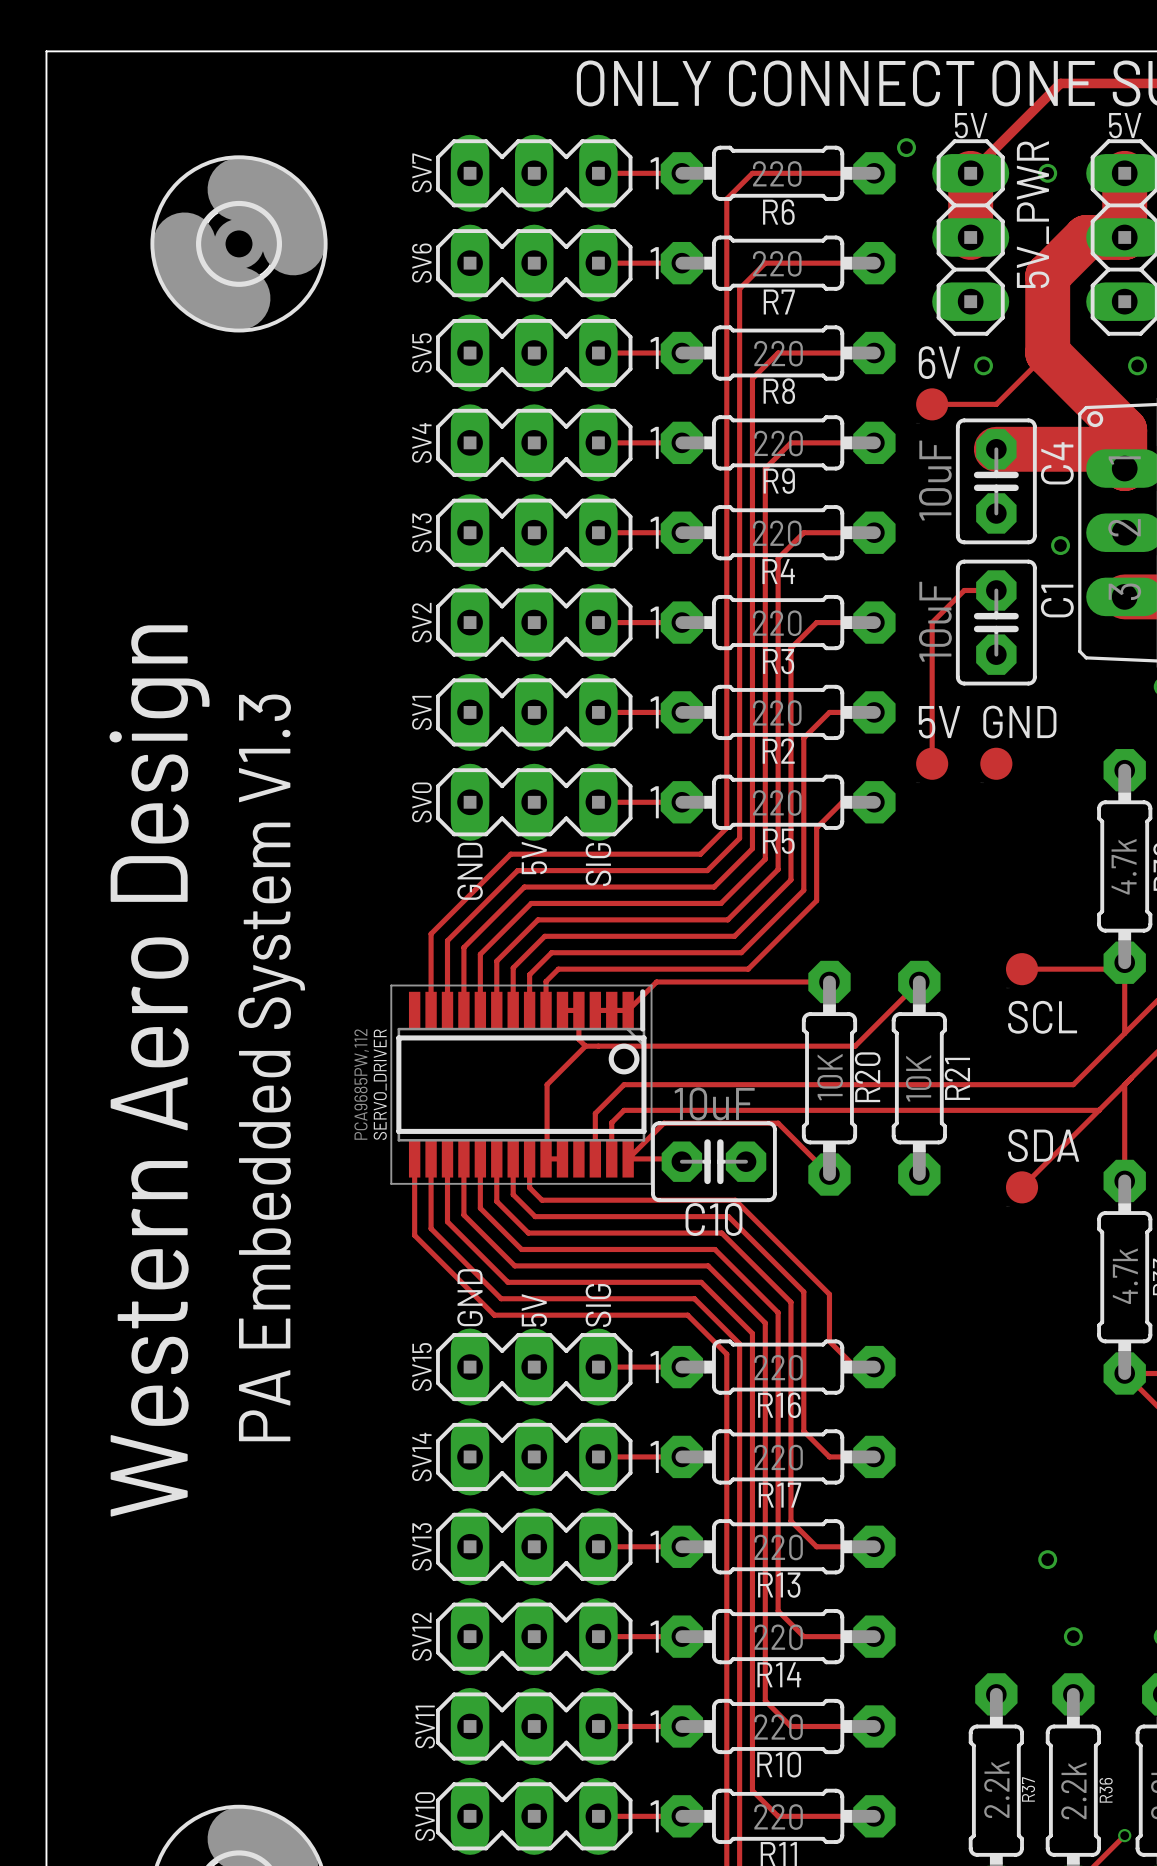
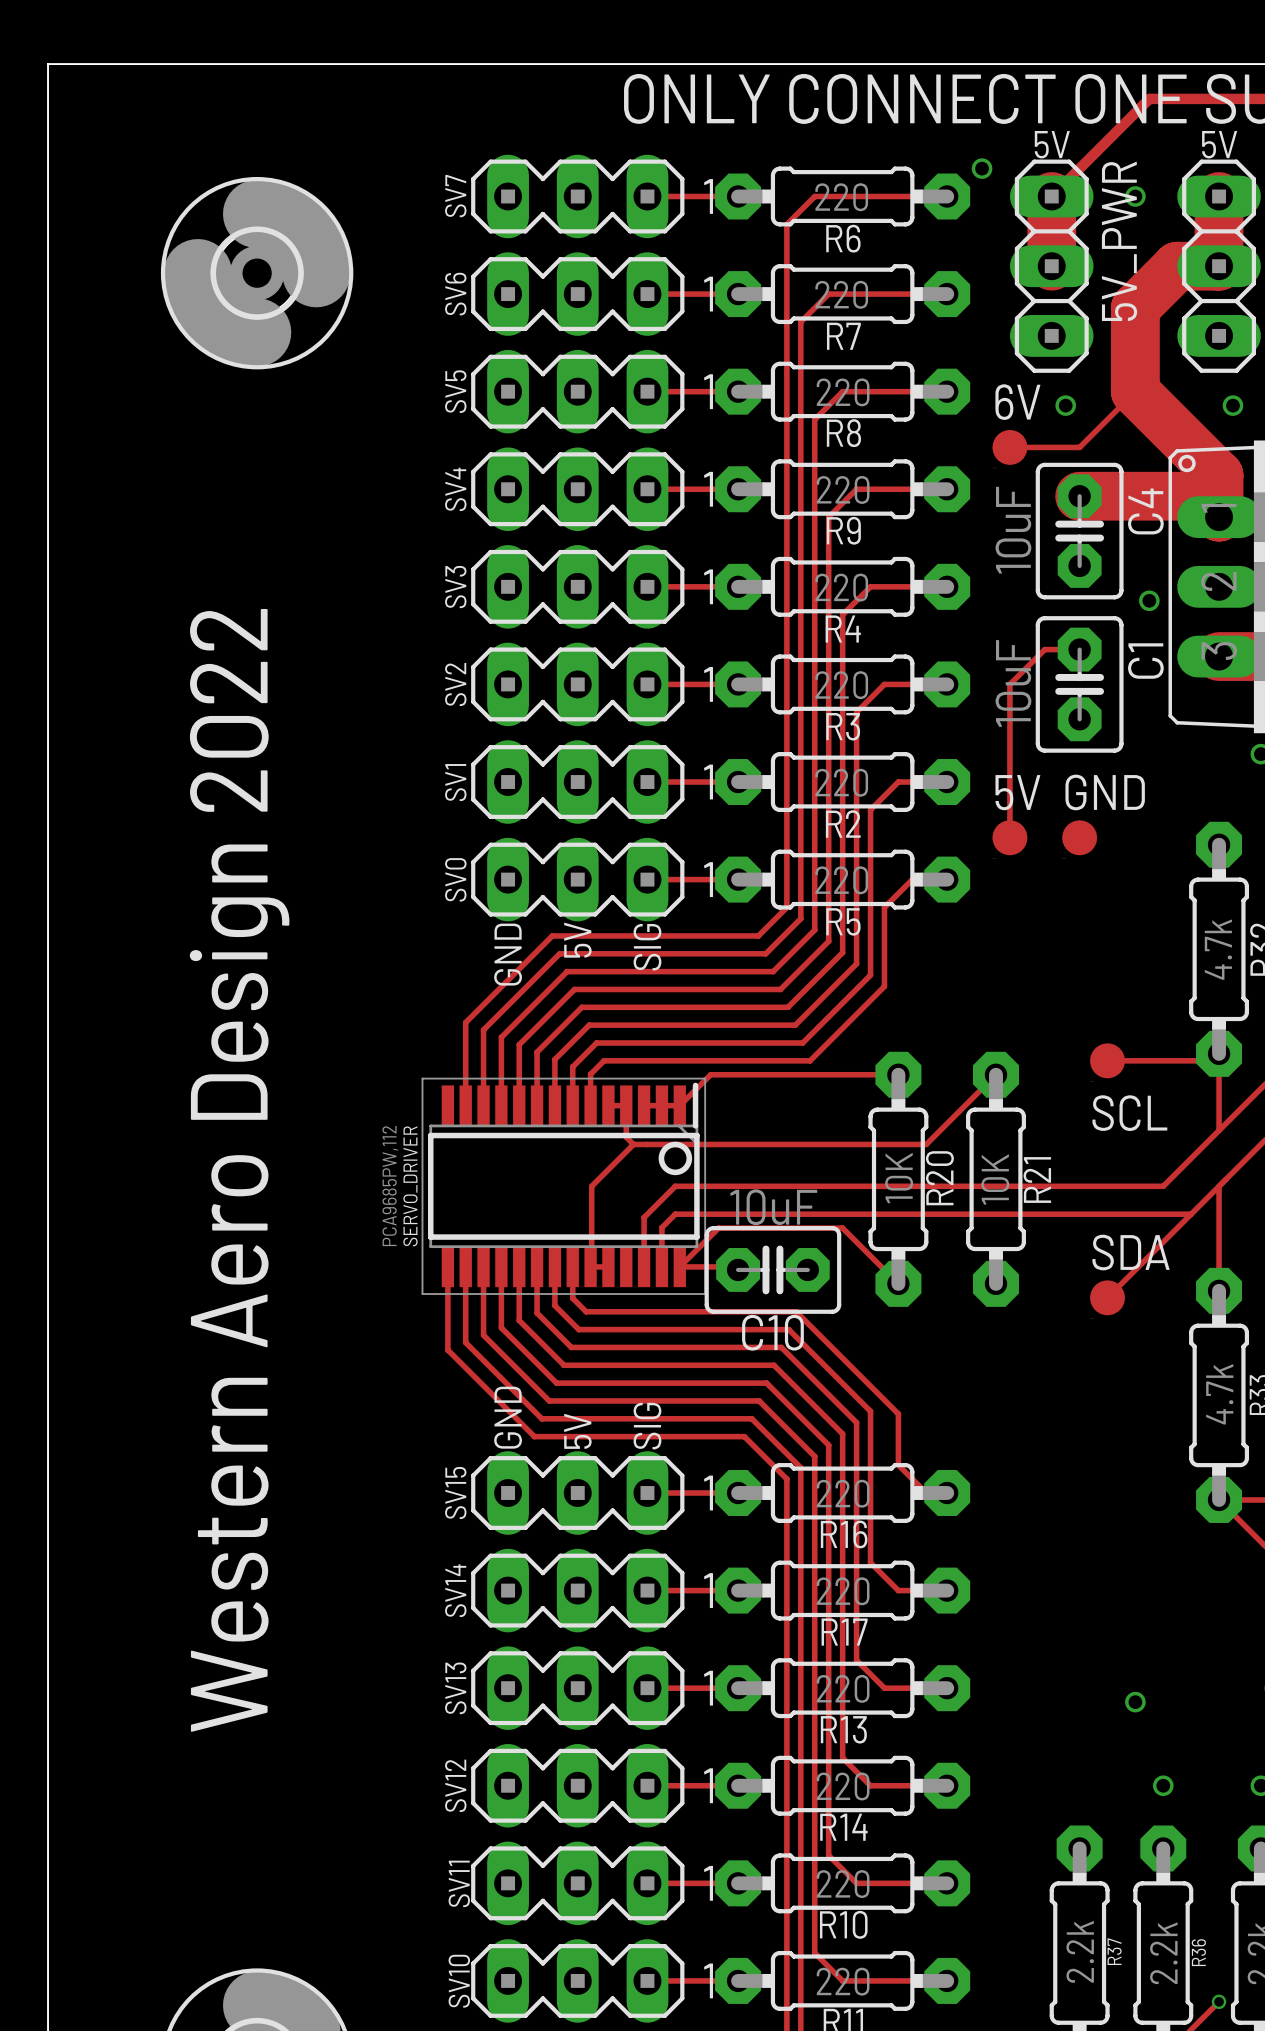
text: PA Embedded System V1.3 (271, 1067) -> none
text: Western Aero Design (159, 1070) -> Western Aero Design 2022 (239, 1170)

